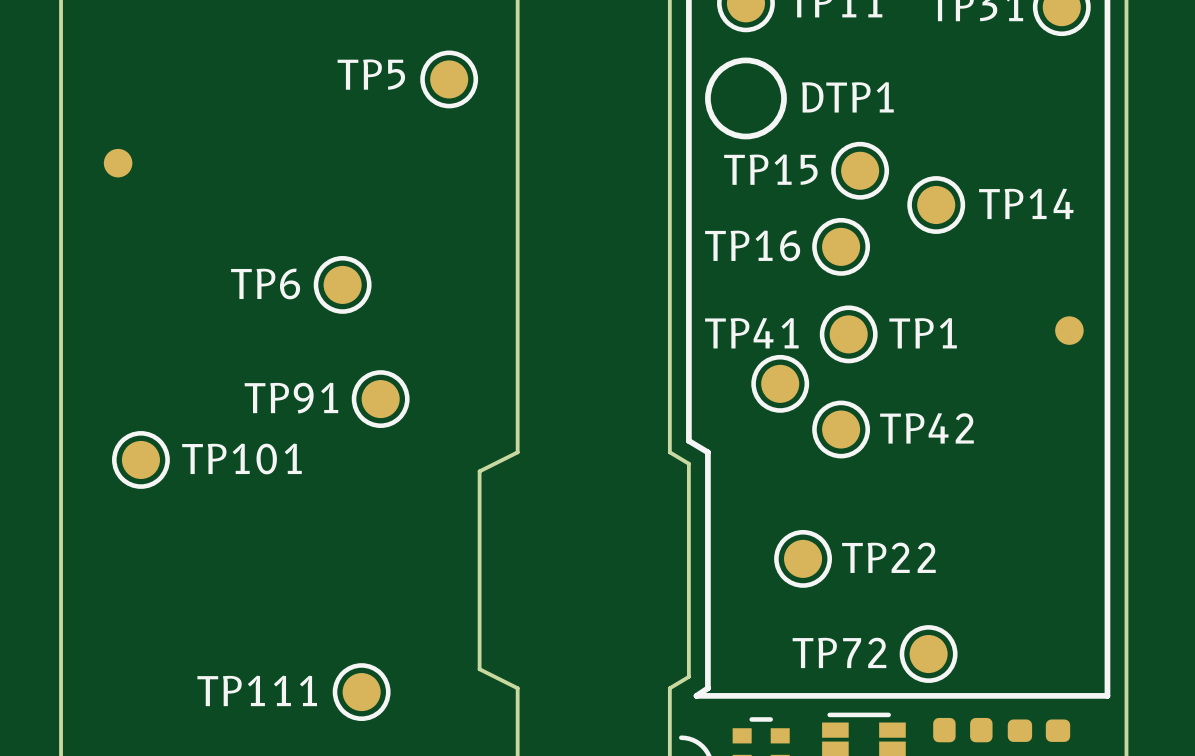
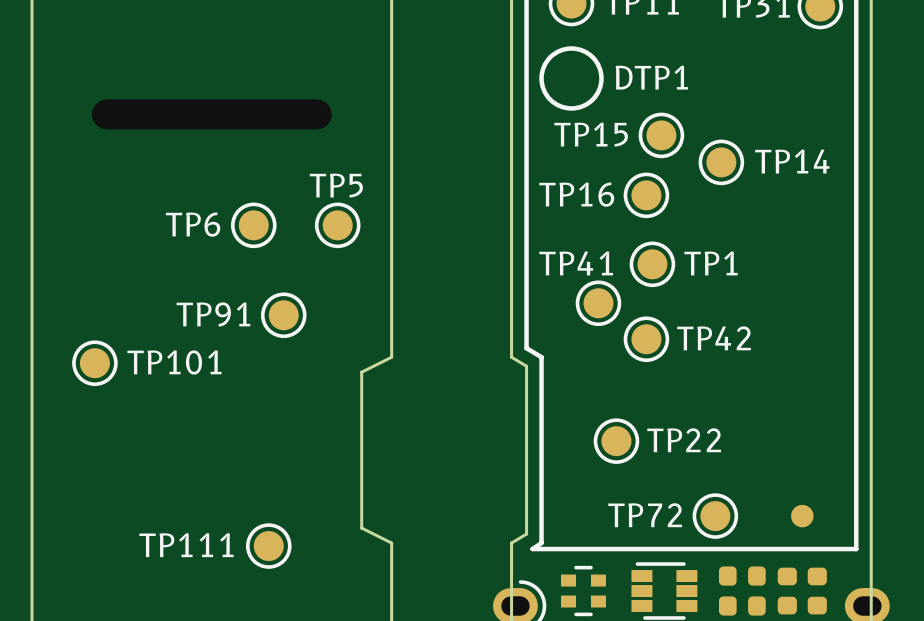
TP5 name position: TP5 (371, 74) -> TP5 (336, 185)
TP5 position: (449, 79) -> (337, 225)
part: none -> (211, 114)
part: (118, 163) -> none
part position: (1069, 330) -> (802, 516)

